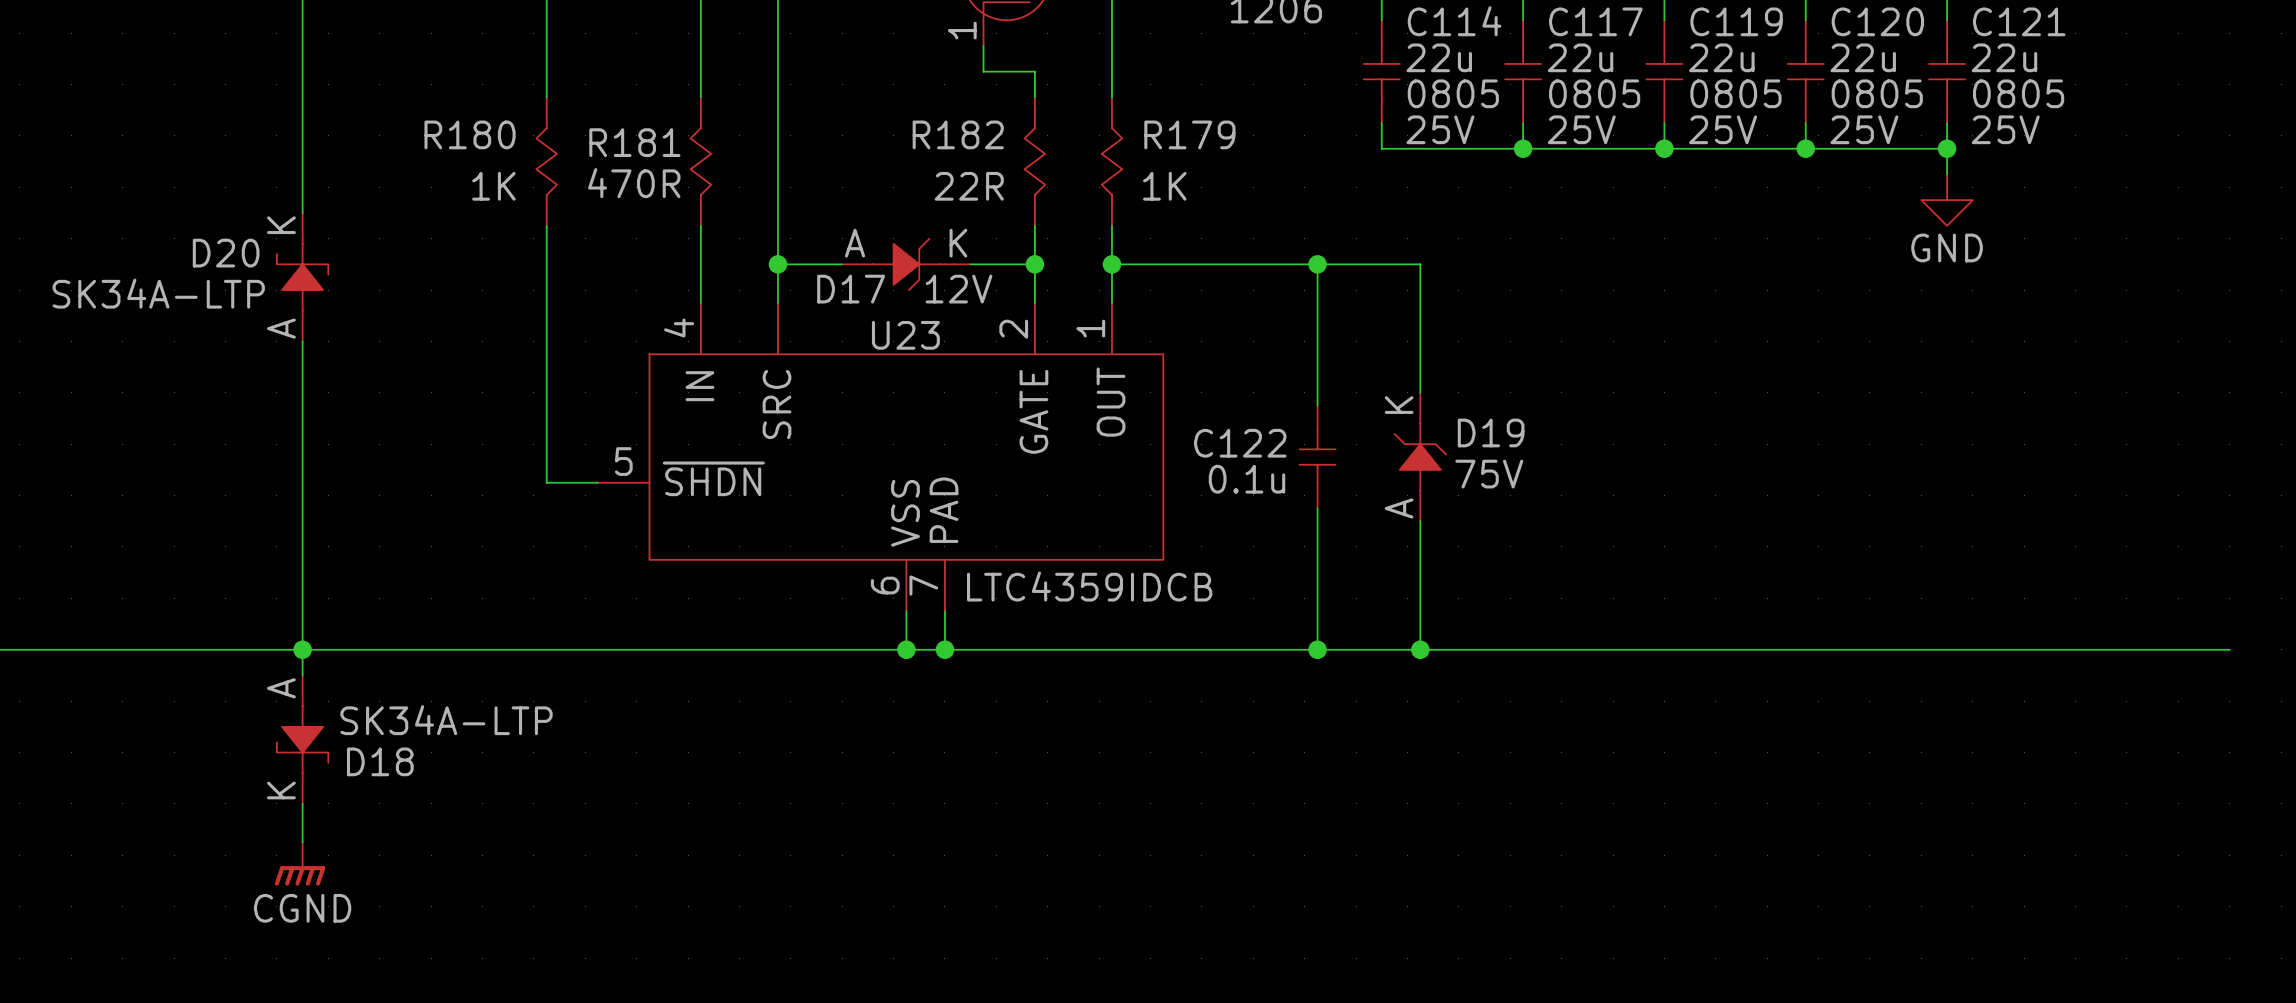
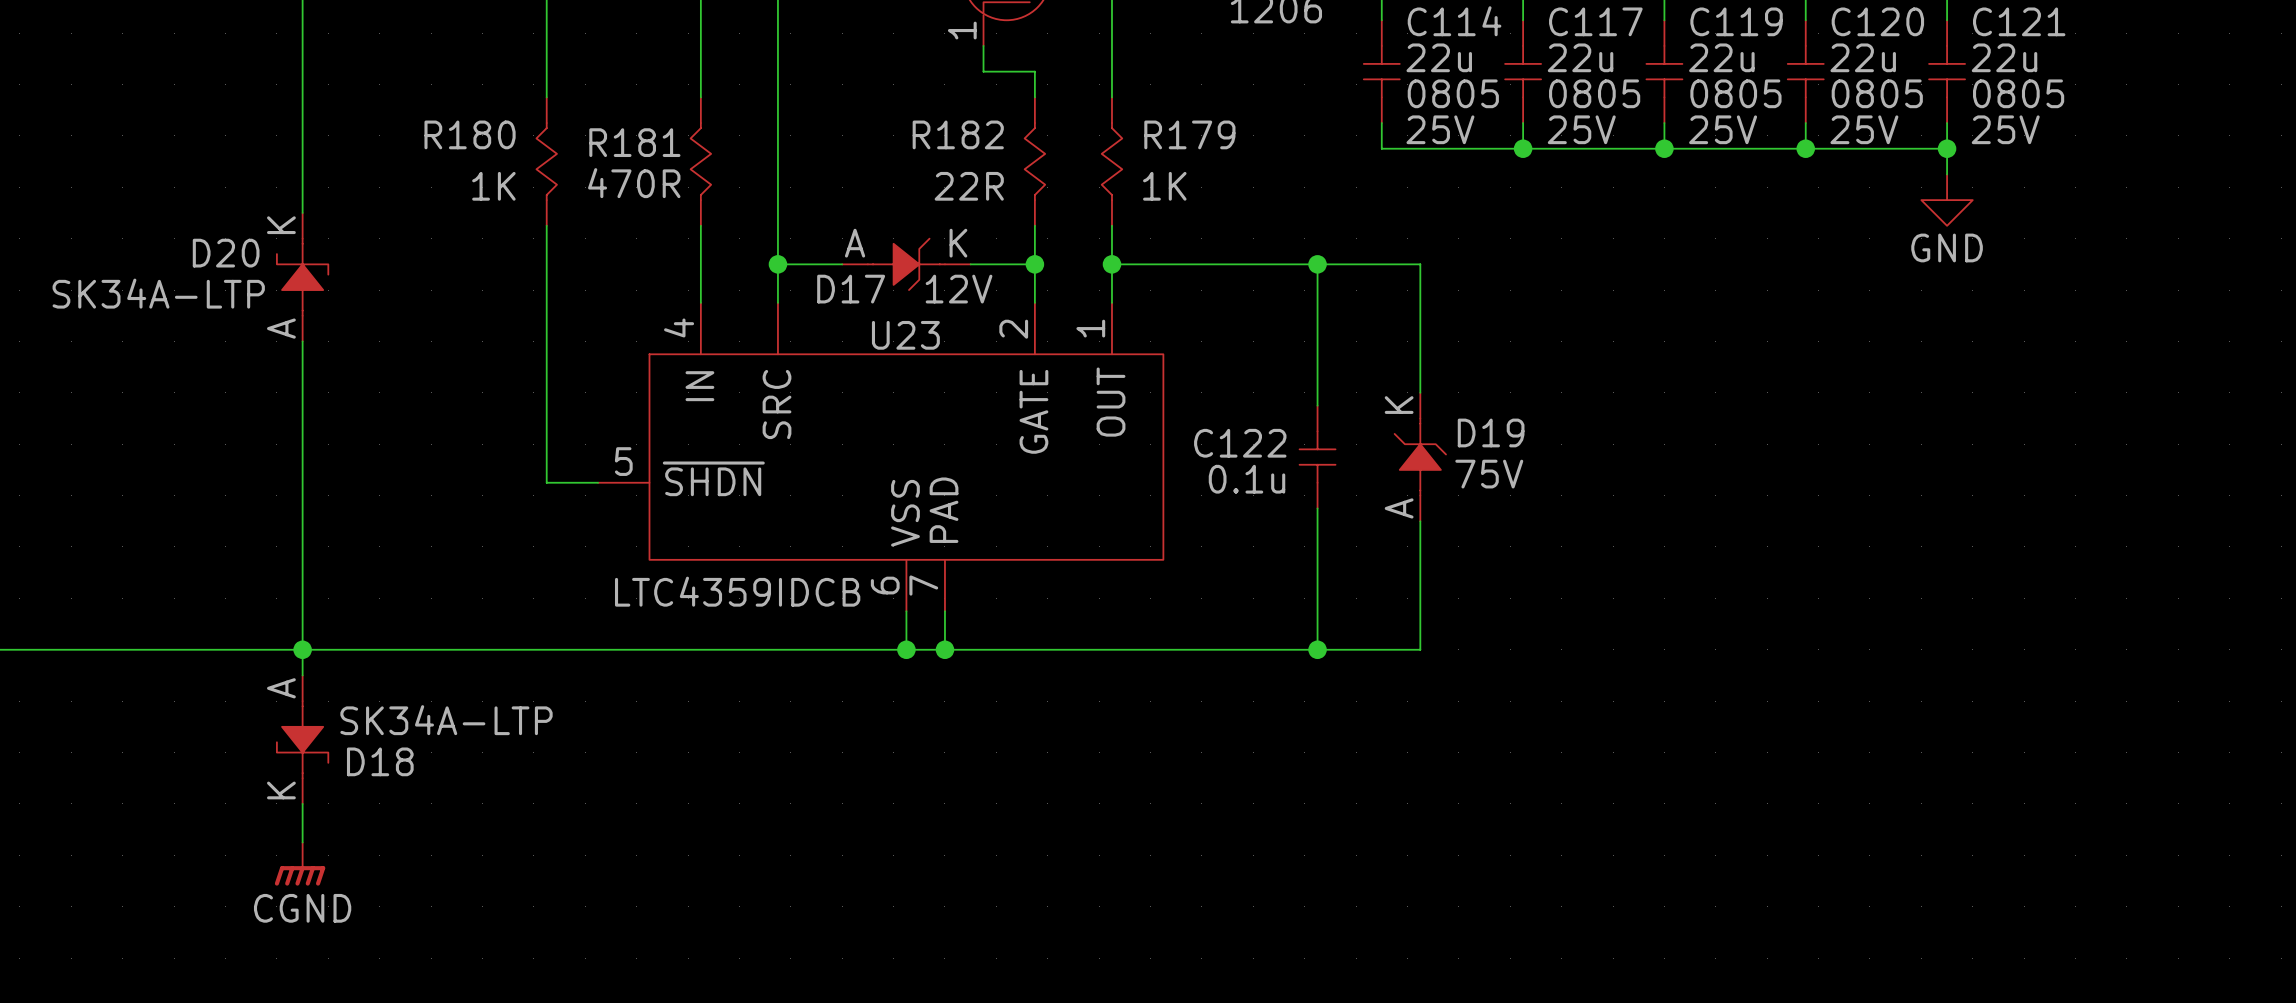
U23 value position: LTC4359IDCB (1089, 586) -> LTC4359IDCB (737, 591)
wire: (1420, 649) (2229, 649) -> none
junction: (1420, 649) -> none

